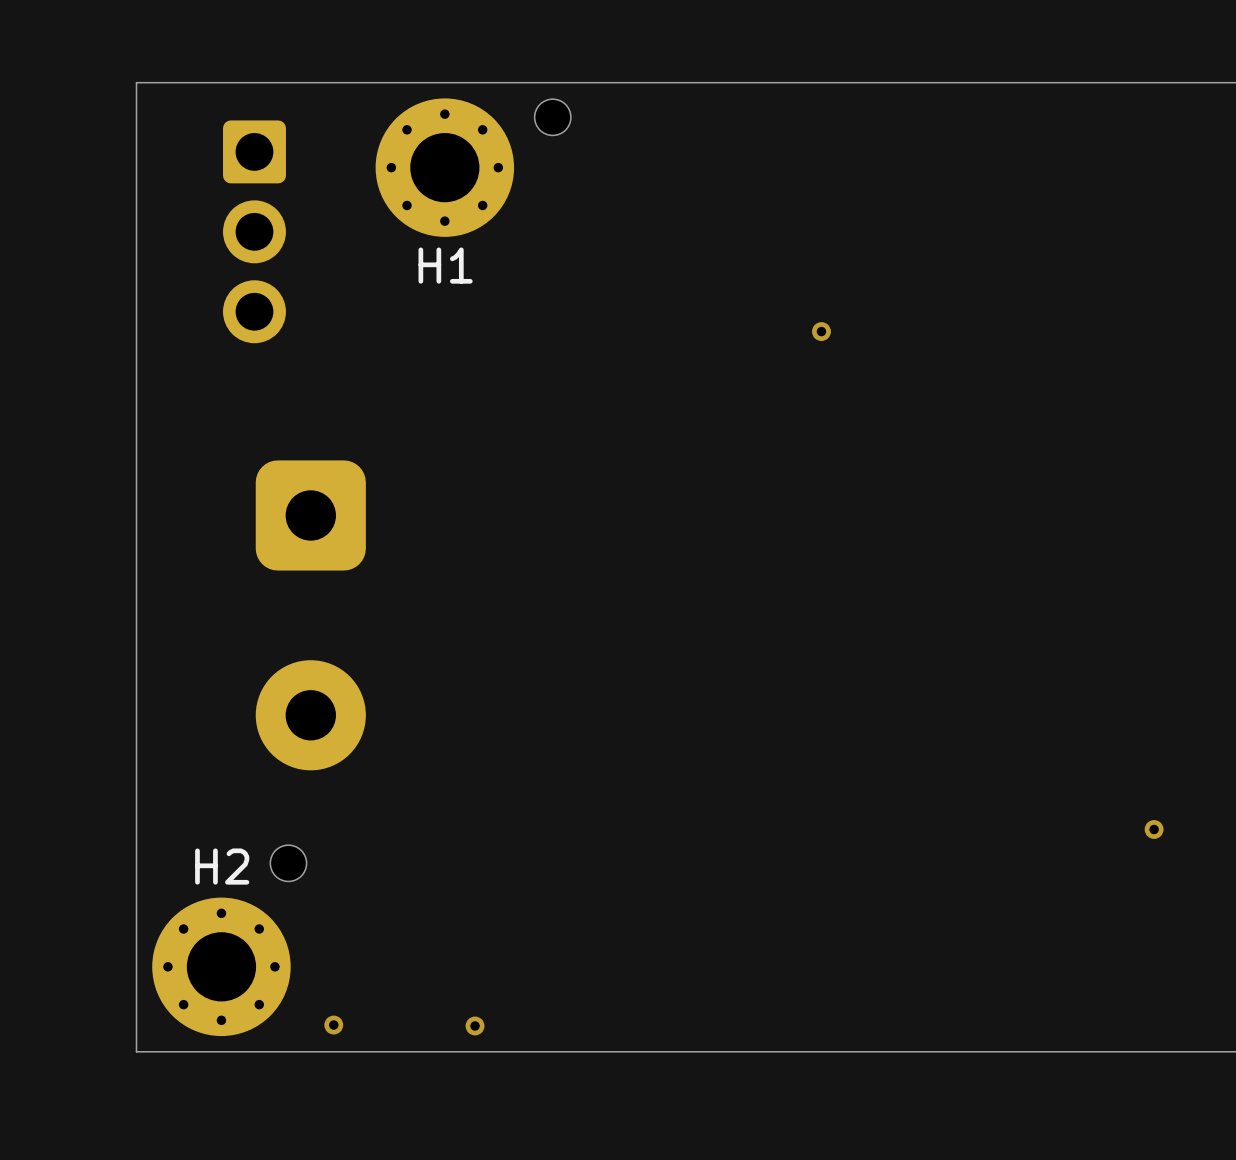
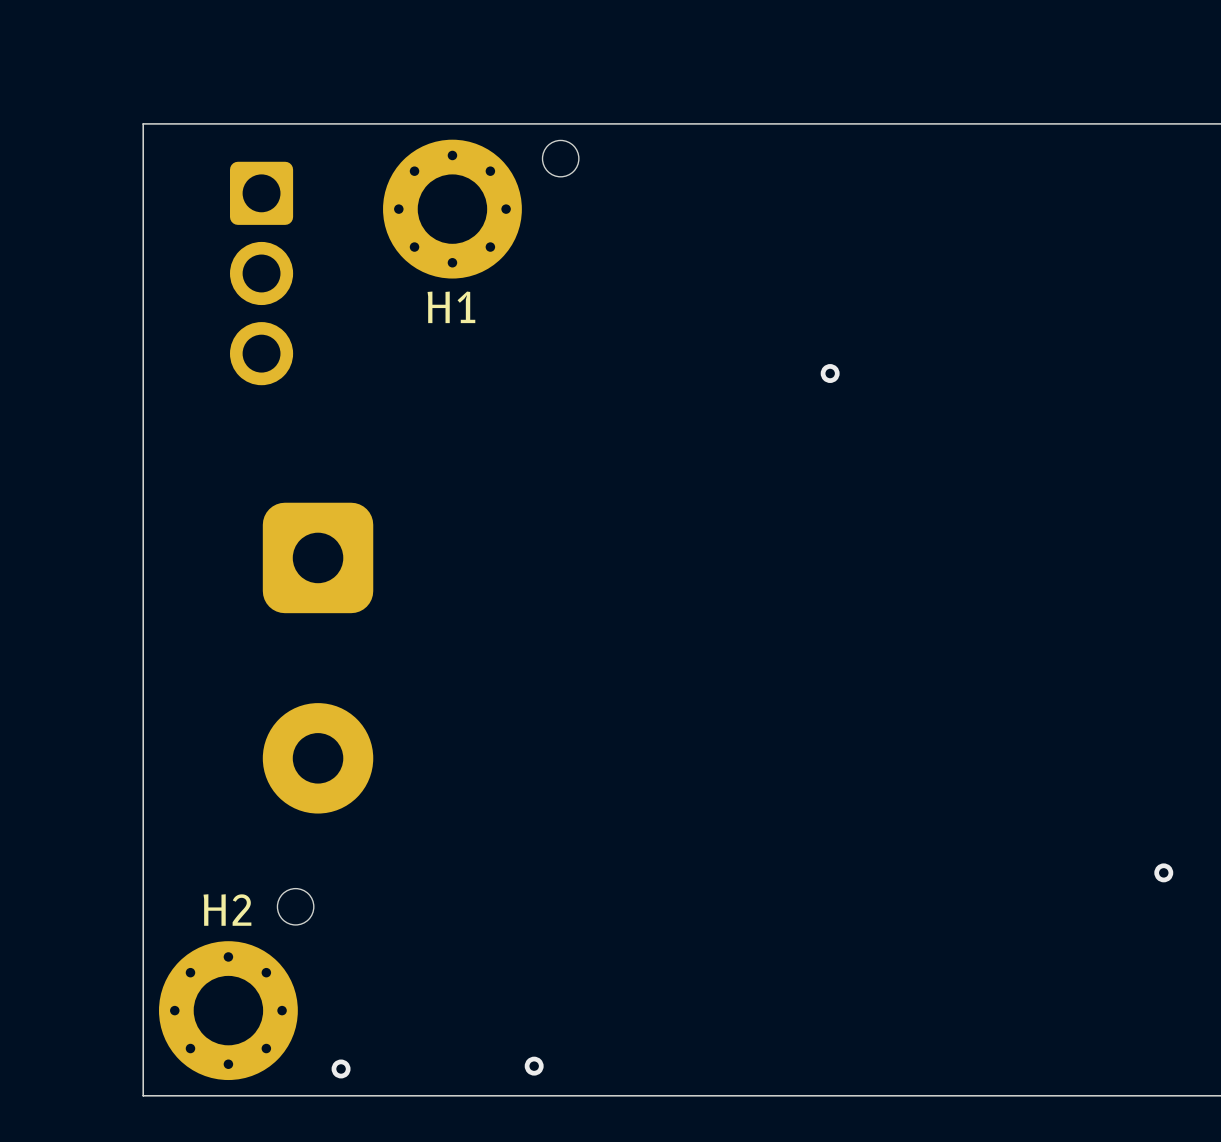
via position: (475, 1025) -> (534, 1066)

